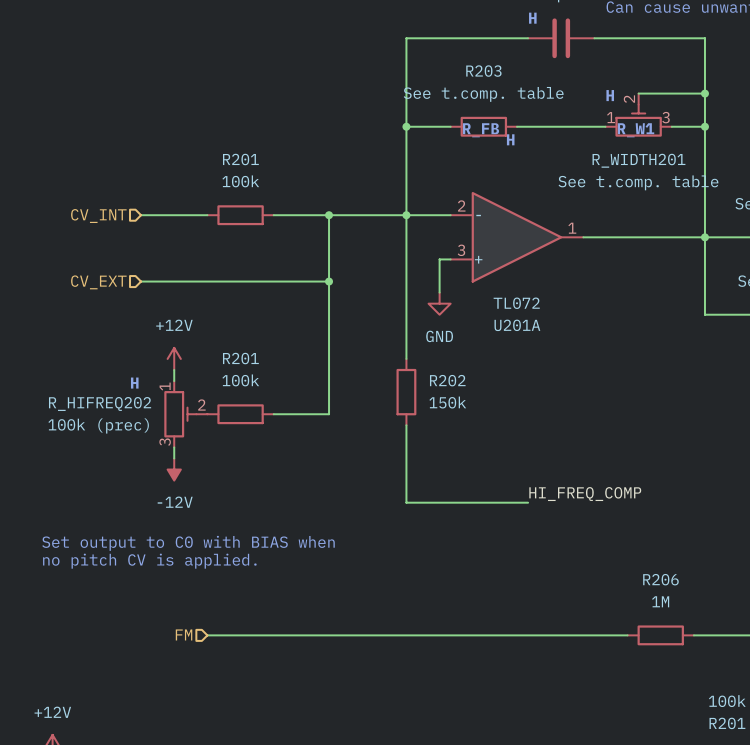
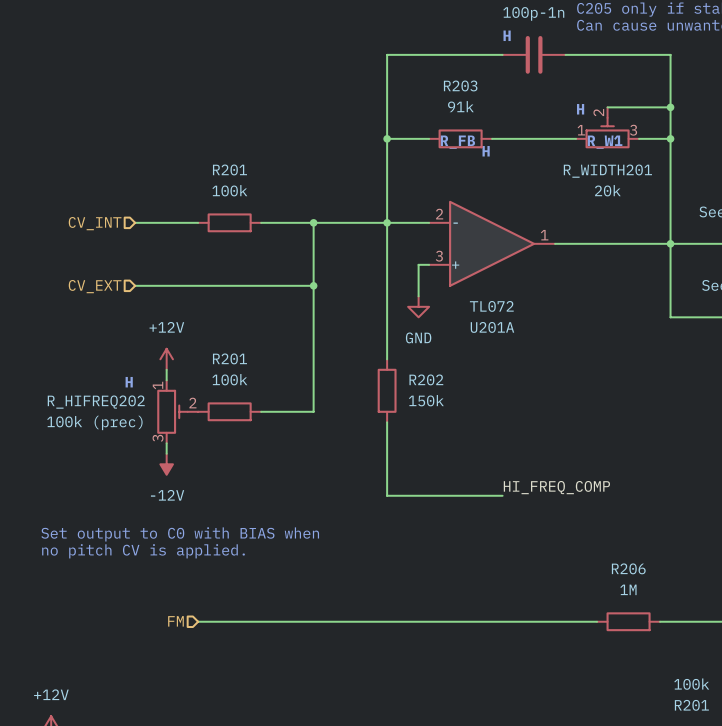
R203 value: See t.comp. table (483, 94) -> 91k (460, 106)
R_WIDTH201 value: See t.comp. table (638, 182) -> 20k (607, 190)

